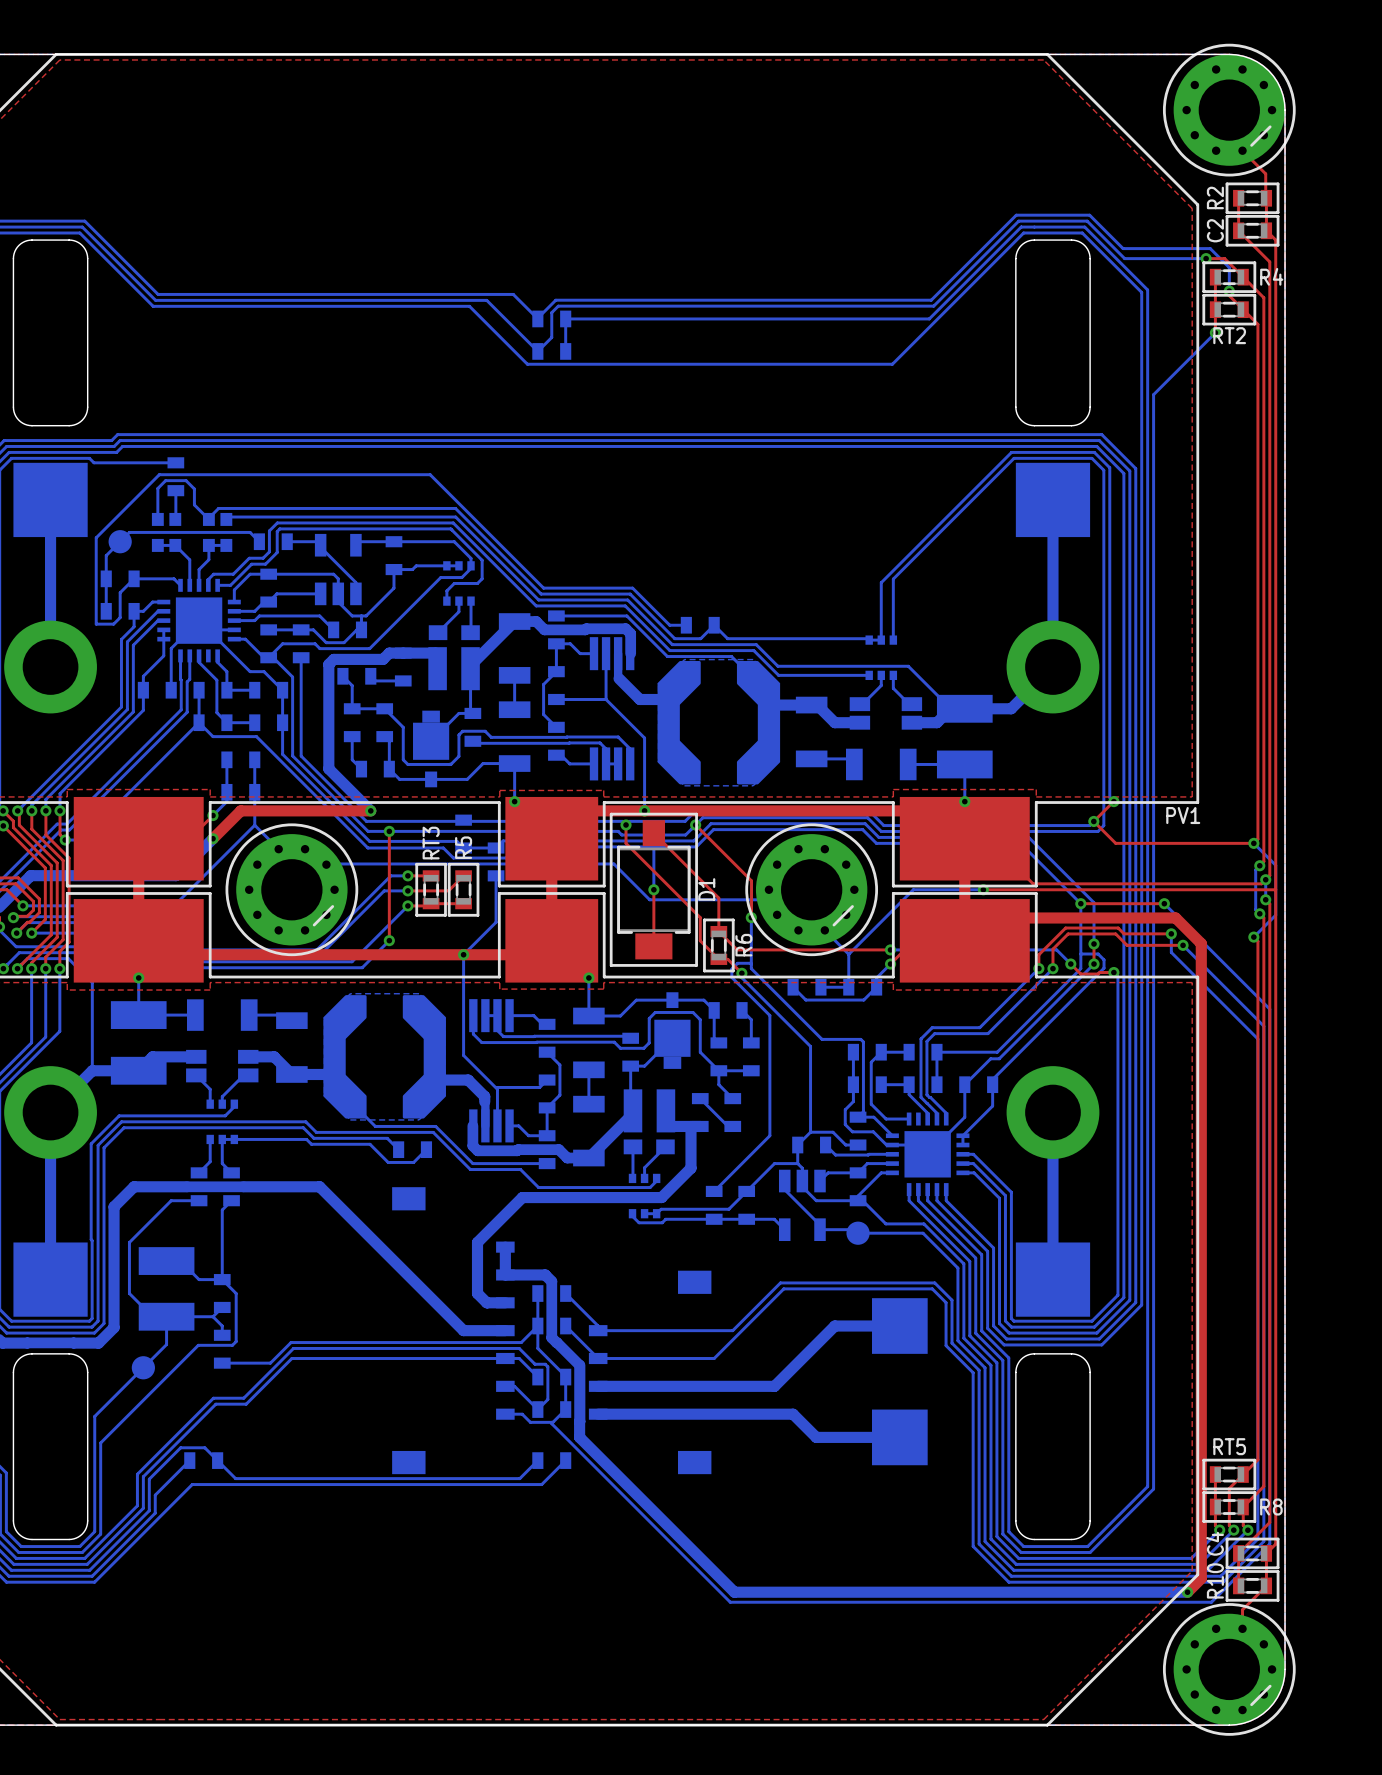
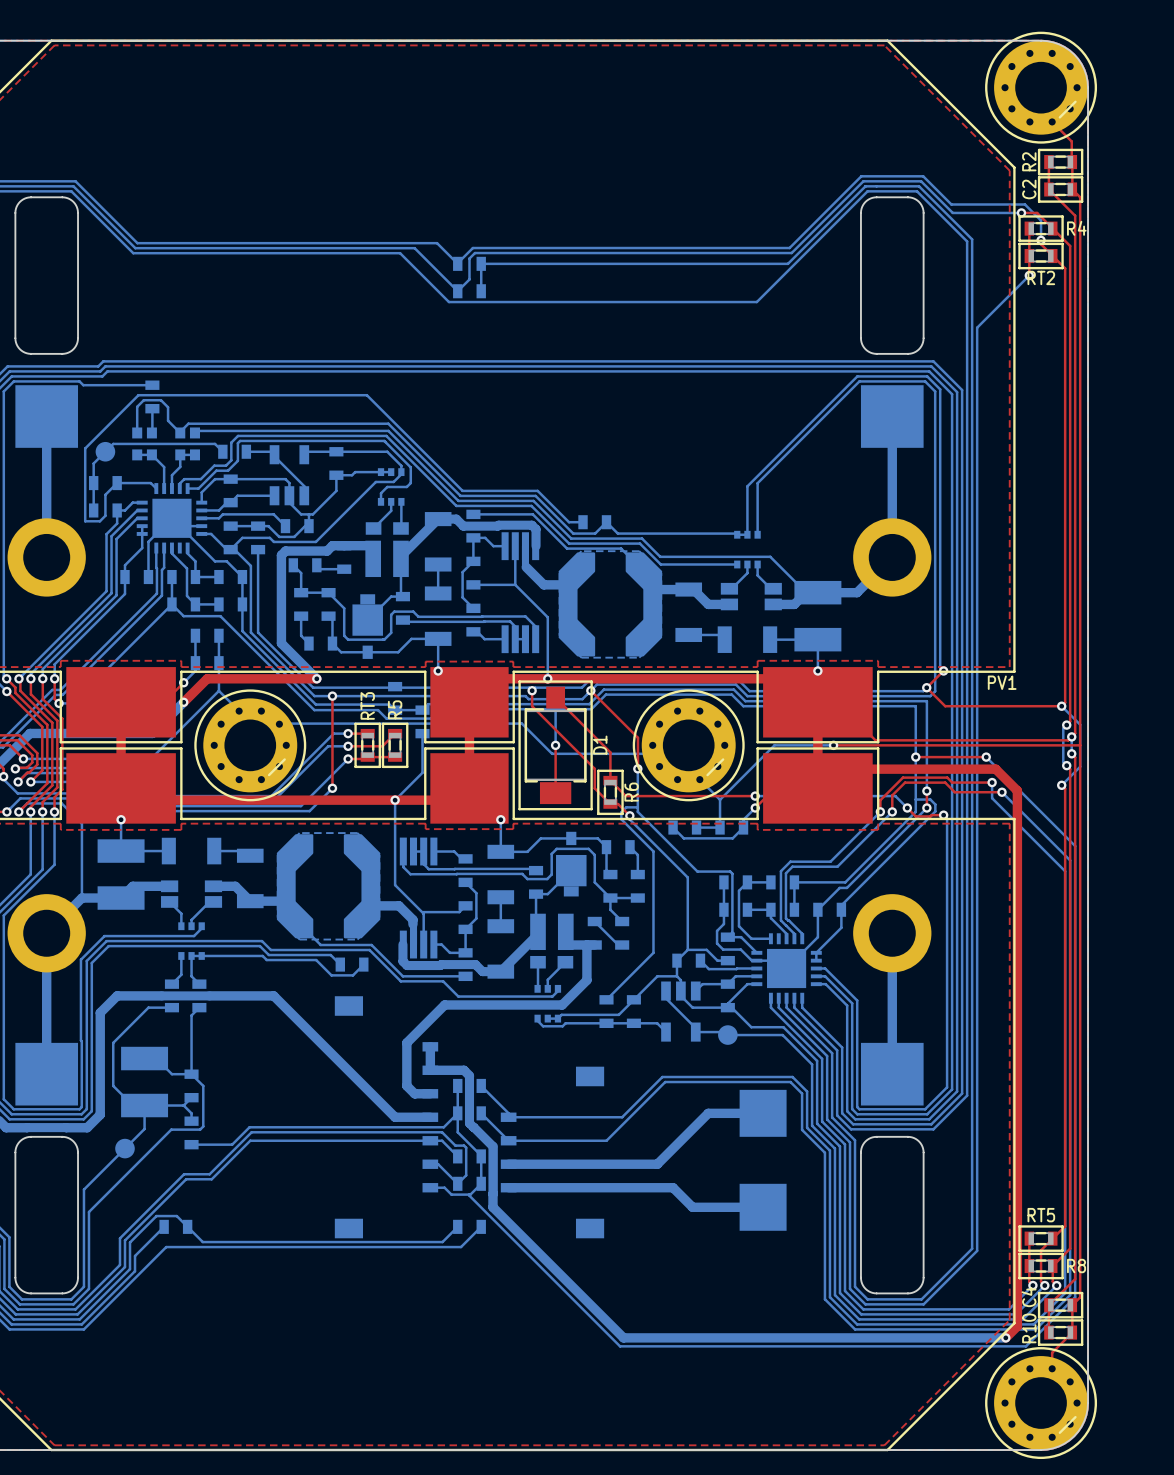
bottom track: (1028, 837) (1094, 902) -> (871, 701) (926, 701) (926, 756)
bottom track: (1020, 843) (1080, 903) -> (864, 706) (915, 706) (915, 757)

